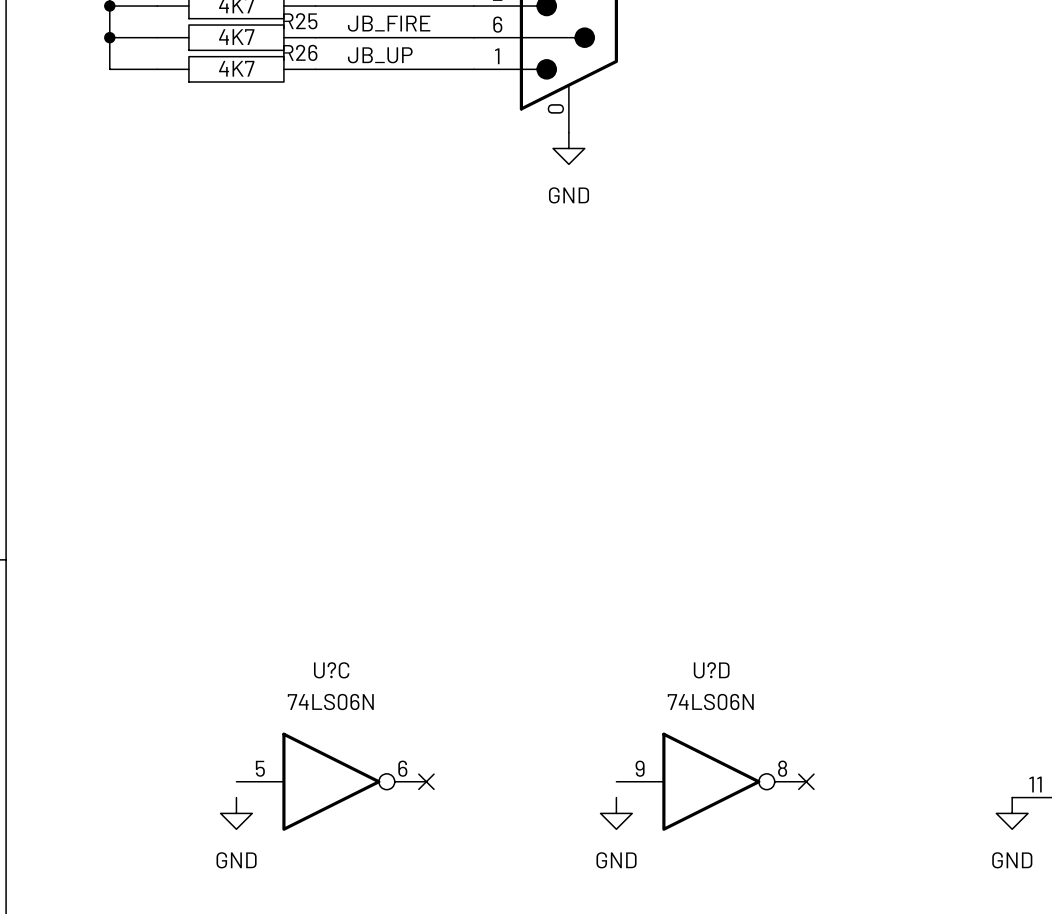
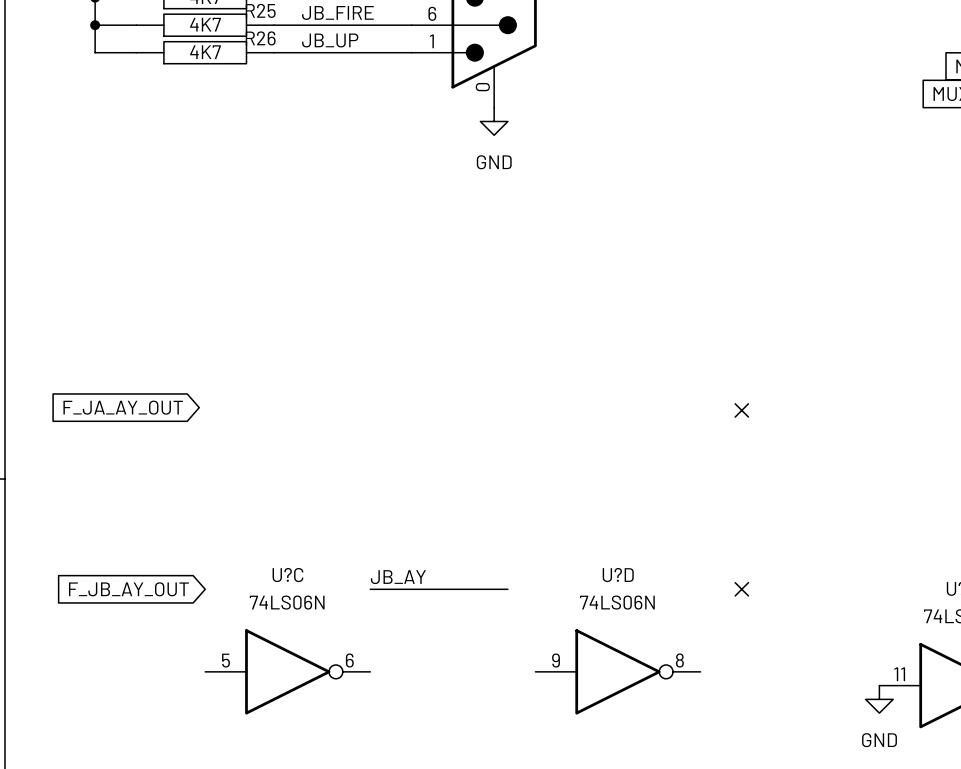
global label: none -> F_JA_AY_OUT (123, 407)
no-connect mark: none -> (741, 410)
label: none -> JB_AY (398, 577)
global label: none -> F_JB_AY_OUT (128, 589)
wire: none -> (370, 589) (507, 589)
no-connect mark: none -> (741, 589)
no-connect mark: (426, 781) -> none
no-connect mark: (806, 781) -> none
power symbol: GND (236, 813) -> none
power symbol: GND (616, 813) -> none

